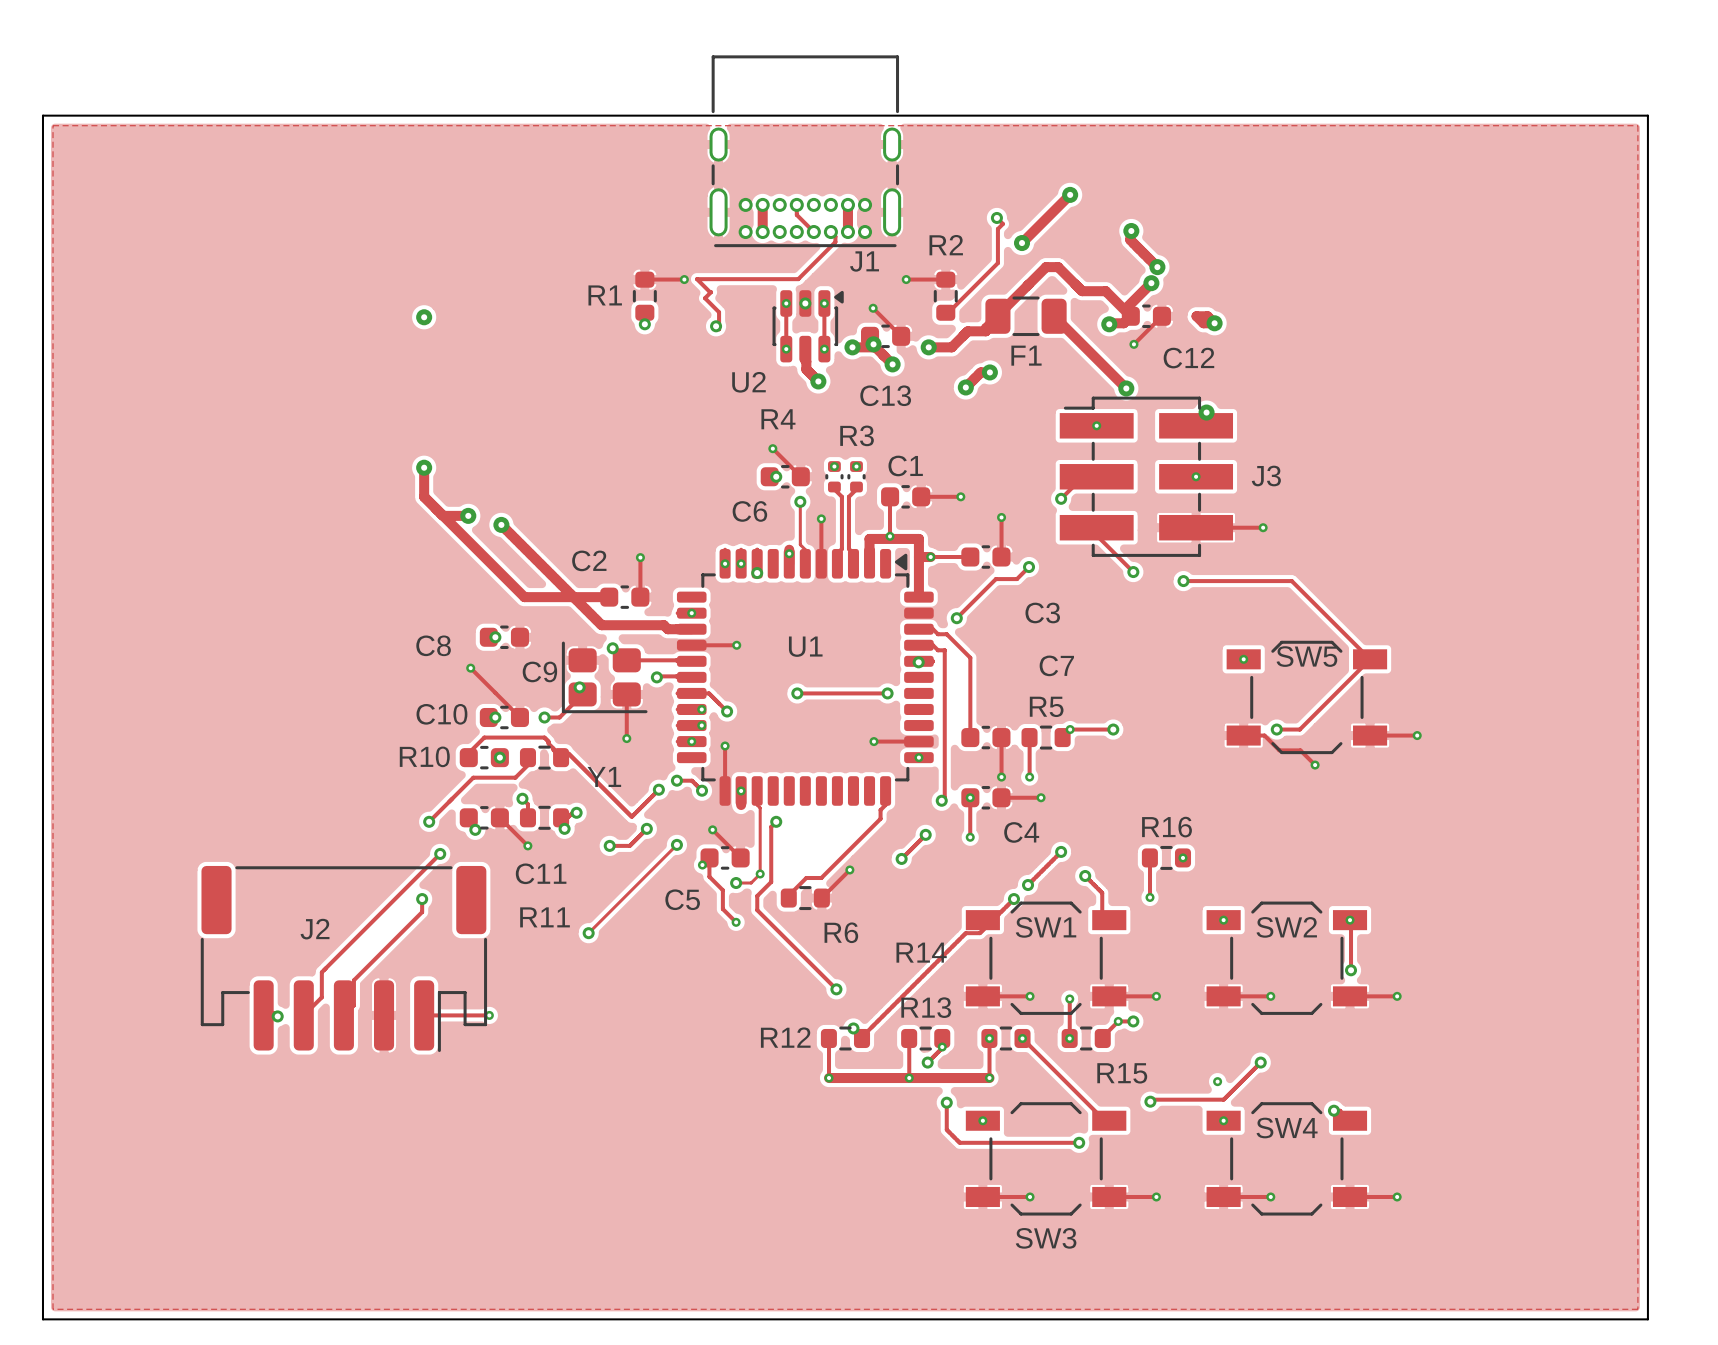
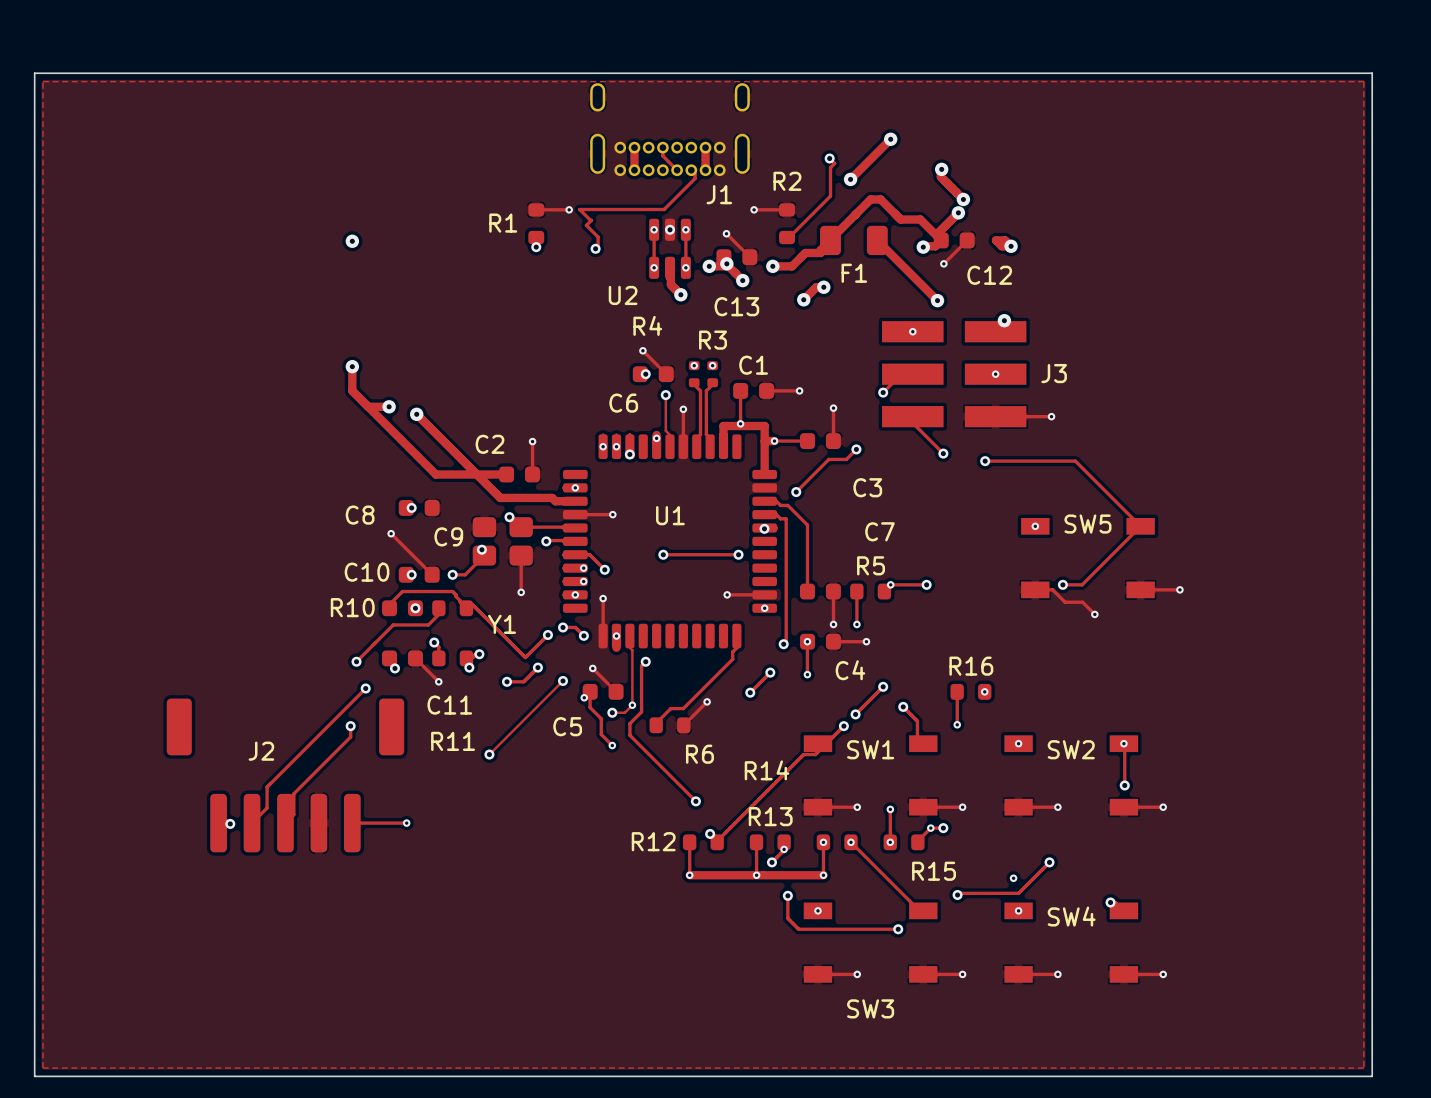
J1 footprint: [709, 55, 902, 248] -> [590, 83, 750, 177]
R1 footprint: [632, 271, 657, 321] -> [528, 203, 545, 245]
R2 footprint: [933, 271, 958, 321] -> [779, 203, 795, 245]
U2 footprint: [772, 290, 844, 363] -> [649, 218, 691, 279]
F1 footprint: [985, 296, 1067, 337] -> [820, 225, 888, 256]
C12 footprint: [1121, 304, 1171, 329] -> [933, 232, 975, 249]
C13 footprint: [861, 324, 911, 349] -> [716, 249, 758, 266]
J3 footprint: [1059, 396, 1234, 557] -> [882, 321, 1027, 428]
R4 footprint: [825, 461, 844, 493] -> [688, 361, 700, 388]
R3 footprint: [847, 461, 866, 493] -> [707, 361, 718, 388]
C6 footprint: [760, 465, 810, 489] -> [632, 366, 674, 383]
C1 footprint: [881, 485, 931, 509] -> [733, 382, 775, 399]
C3 footprint: [961, 545, 1011, 569] -> [799, 433, 841, 450]
U1 footprint: [676, 548, 934, 806] -> [563, 434, 778, 649]
C2 footprint: [600, 585, 650, 609] -> [499, 466, 541, 483]
C9 footprint: [479, 625, 529, 649] -> [398, 500, 440, 516]
SW5 footprint: [1226, 640, 1388, 755] -> [1021, 517, 1155, 599]
Y1 footprint: [561, 641, 648, 714] -> [472, 517, 533, 566]
C8 footprint: [479, 705, 529, 730] -> [398, 566, 440, 583]
C7 footprint: [961, 725, 1011, 750] -> [799, 583, 841, 600]
R5 footprint: [1021, 725, 1071, 750] -> [850, 583, 892, 600]
C10 footprint: [459, 745, 509, 770] -> [382, 600, 423, 617]
R10 footprint: [519, 745, 570, 770] -> [432, 600, 474, 617]
C4 footprint: [961, 786, 1011, 810] -> [799, 633, 841, 650]
R11 footprint: [519, 805, 570, 830] -> [432, 650, 474, 667]
C11 footprint: [459, 806, 509, 830] -> [382, 650, 423, 667]
R16 footprint: [1141, 845, 1192, 870] -> [950, 683, 992, 700]
C5 footprint: [700, 846, 750, 870] -> [582, 683, 624, 700]
J2 footprint: [200, 865, 488, 1053] -> [166, 698, 405, 853]
R6 footprint: [780, 886, 830, 911] -> [649, 717, 691, 734]
SW1 footprint: [965, 901, 1127, 1015] -> [803, 735, 938, 816]
SW2 footprint: [1206, 901, 1368, 1015] -> [1004, 735, 1139, 816]
R12 footprint: [820, 1026, 871, 1051] -> [682, 834, 724, 851]
R13 footprint: [901, 1026, 951, 1051] -> [749, 834, 791, 851]
R14 footprint: [981, 1026, 1031, 1051] -> [816, 834, 858, 851]
R15 footprint: [1061, 1026, 1111, 1051] -> [883, 834, 925, 851]
SW3 footprint: [965, 1102, 1127, 1216] -> [803, 902, 938, 983]
SW4 footprint: [1206, 1102, 1368, 1216] -> [1004, 902, 1139, 983]

